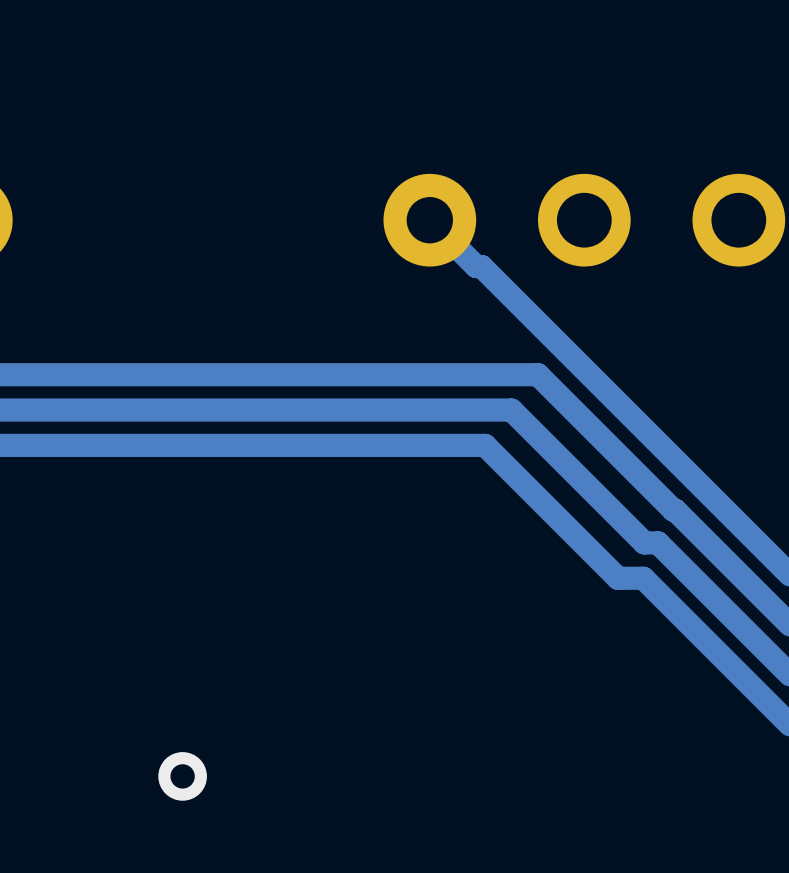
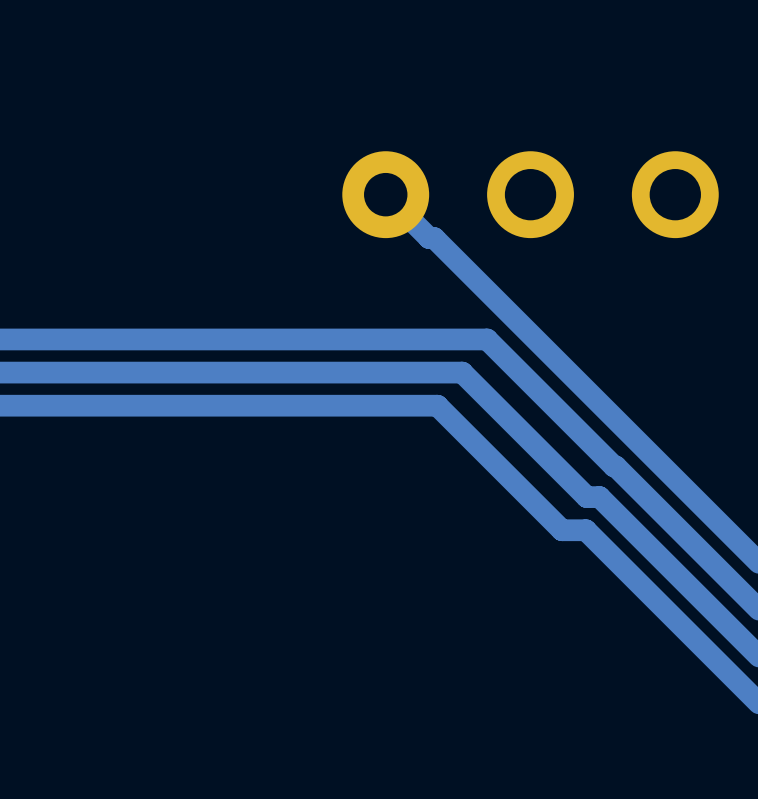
via: (182, 776) -> none

